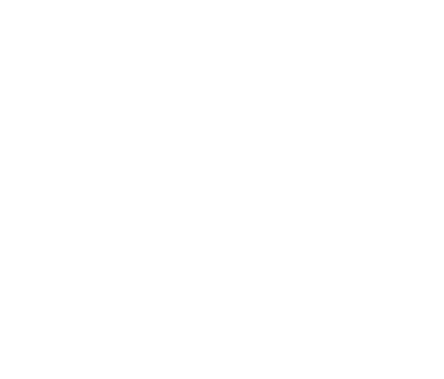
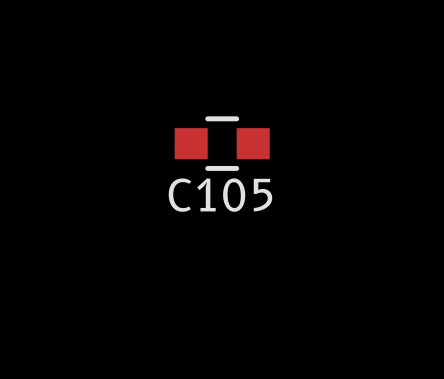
C105: none -> (222, 143)

